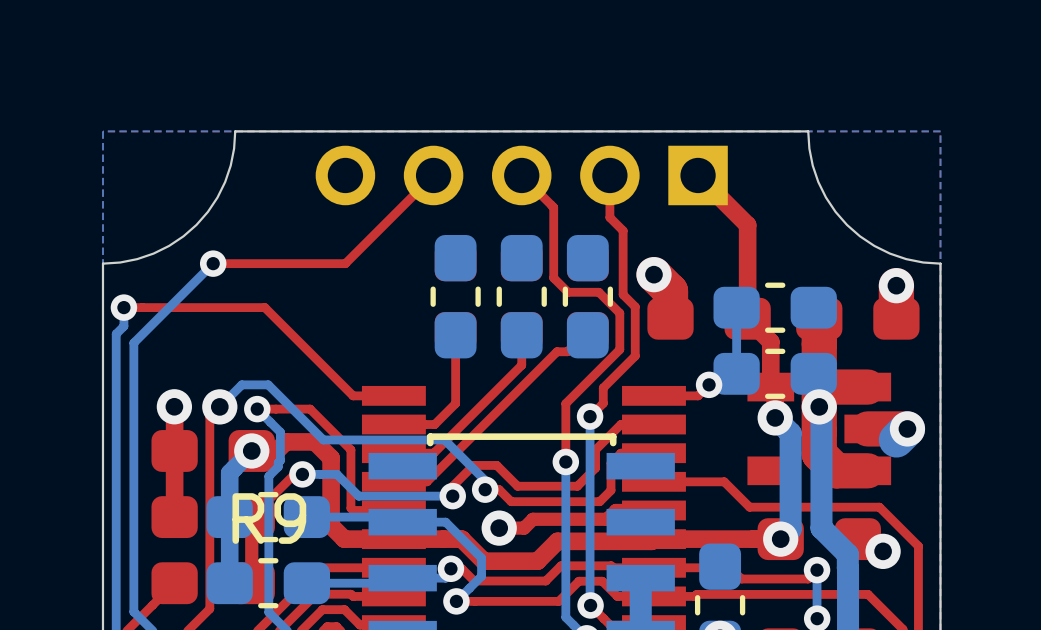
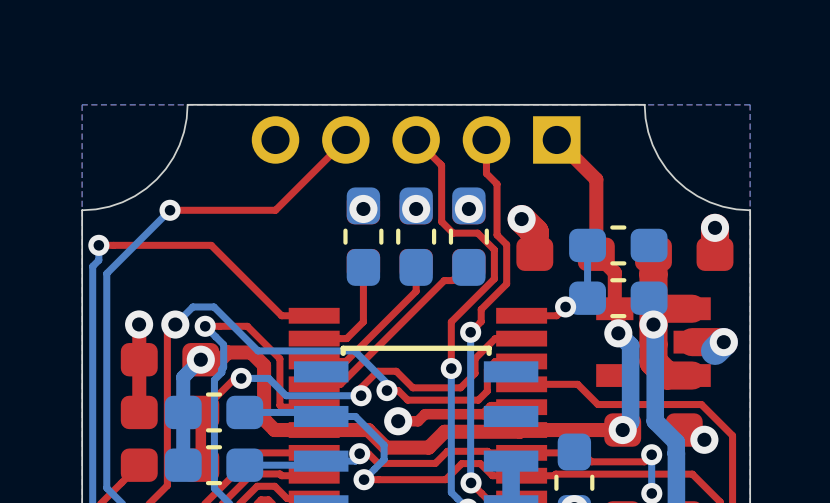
via: none -> (363, 208)
via: none -> (416, 208)
via: none -> (468, 208)
R9 name: R9 (269, 518) -> none

